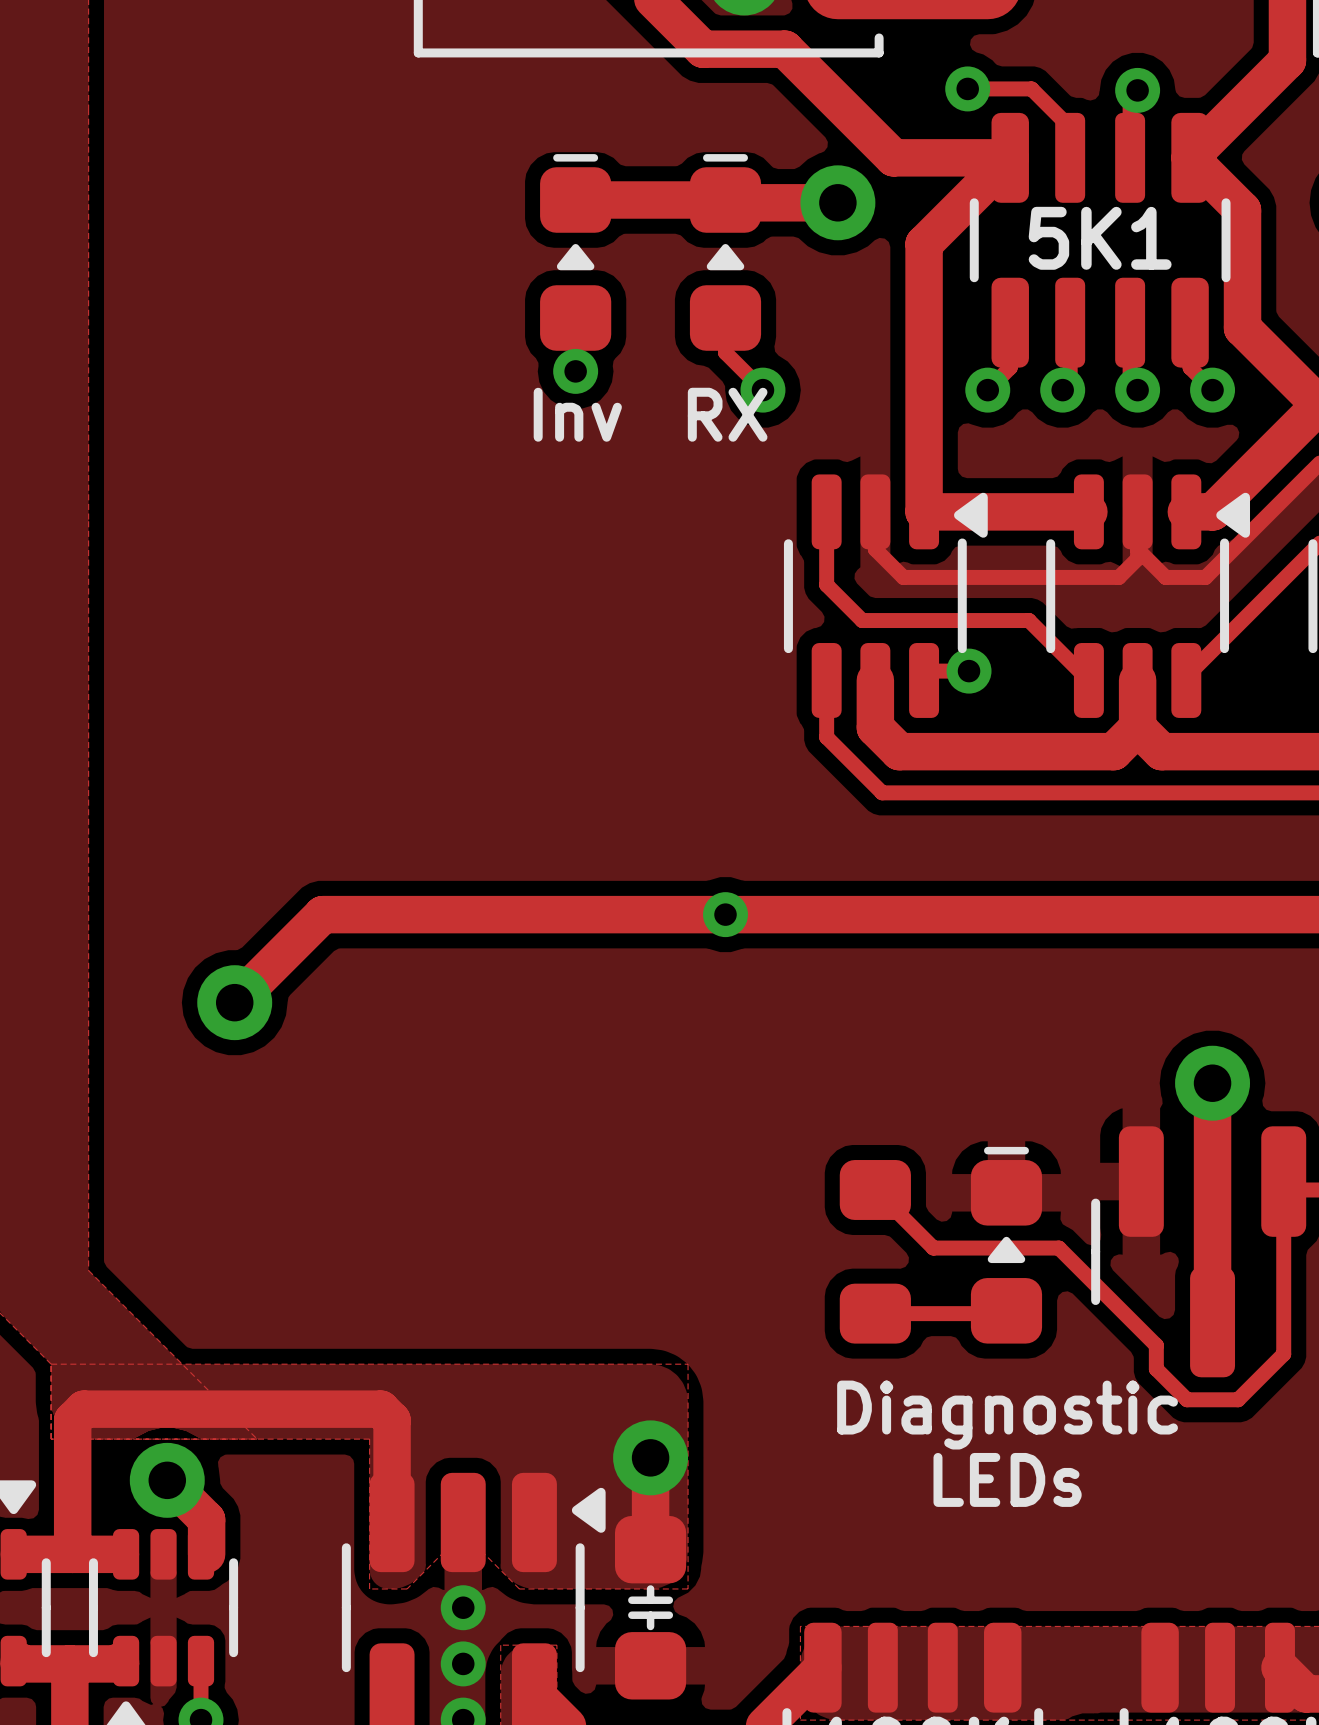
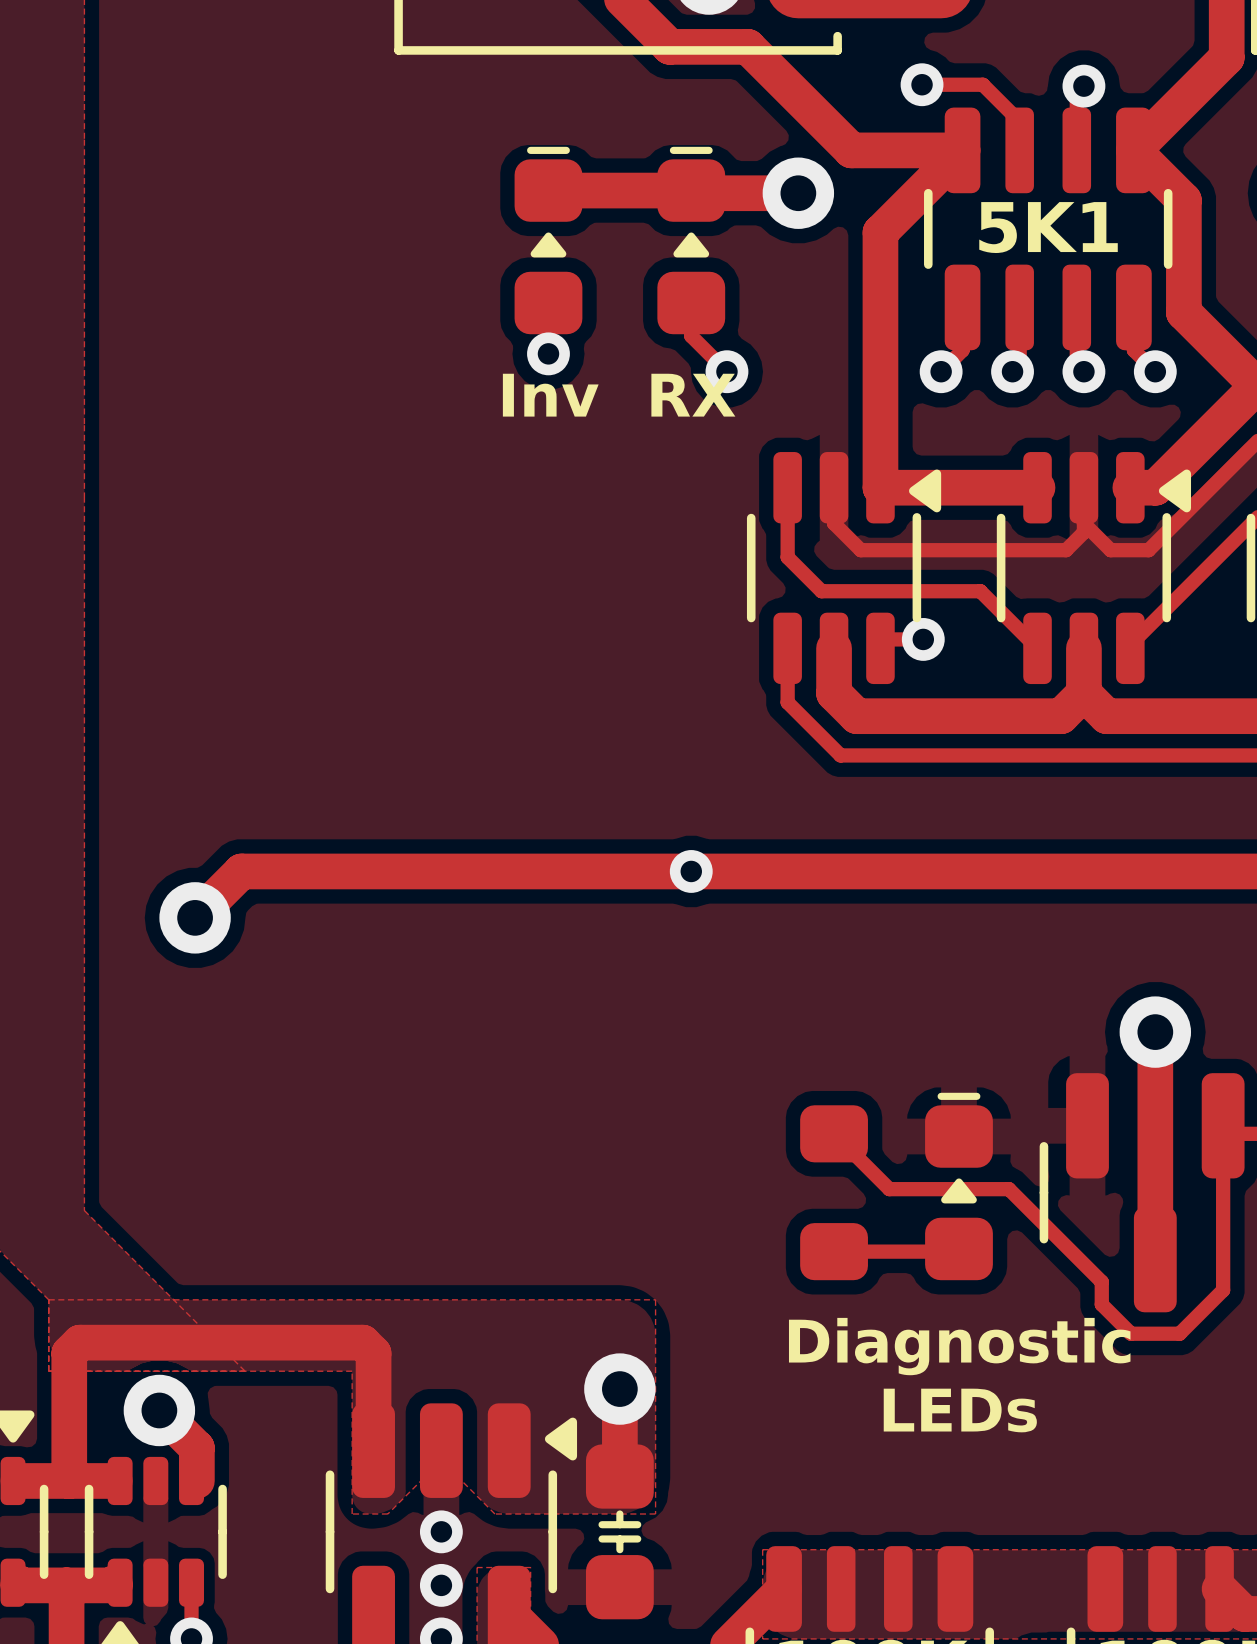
track: (322, 914) (234, 1002) -> (307, 871) (241, 871) (195, 917)
via position: (234, 1002) -> (195, 917)

